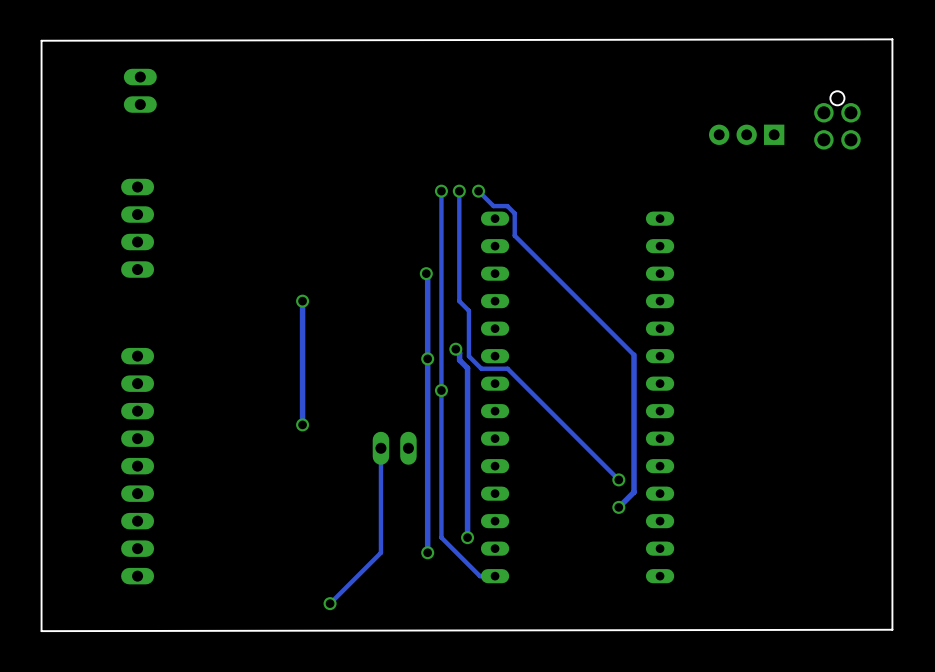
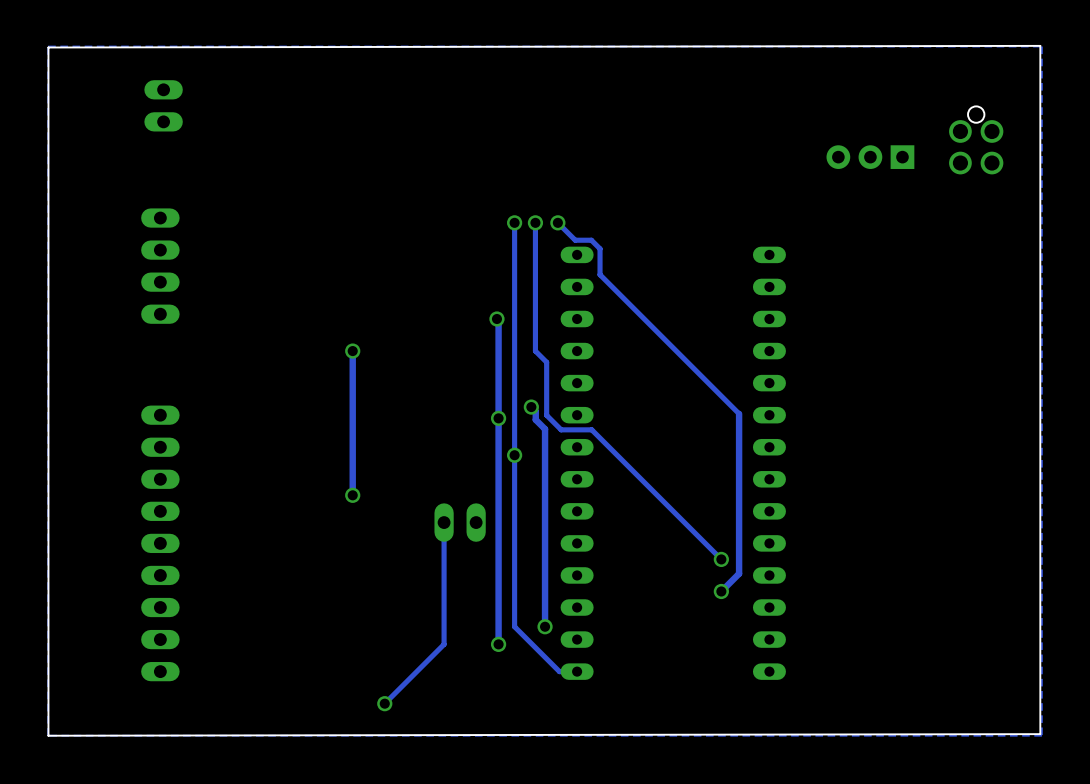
zone outline: none -> (1041, 46) (1041, 735) (48, 735) (48, 46) (1041, 46)

